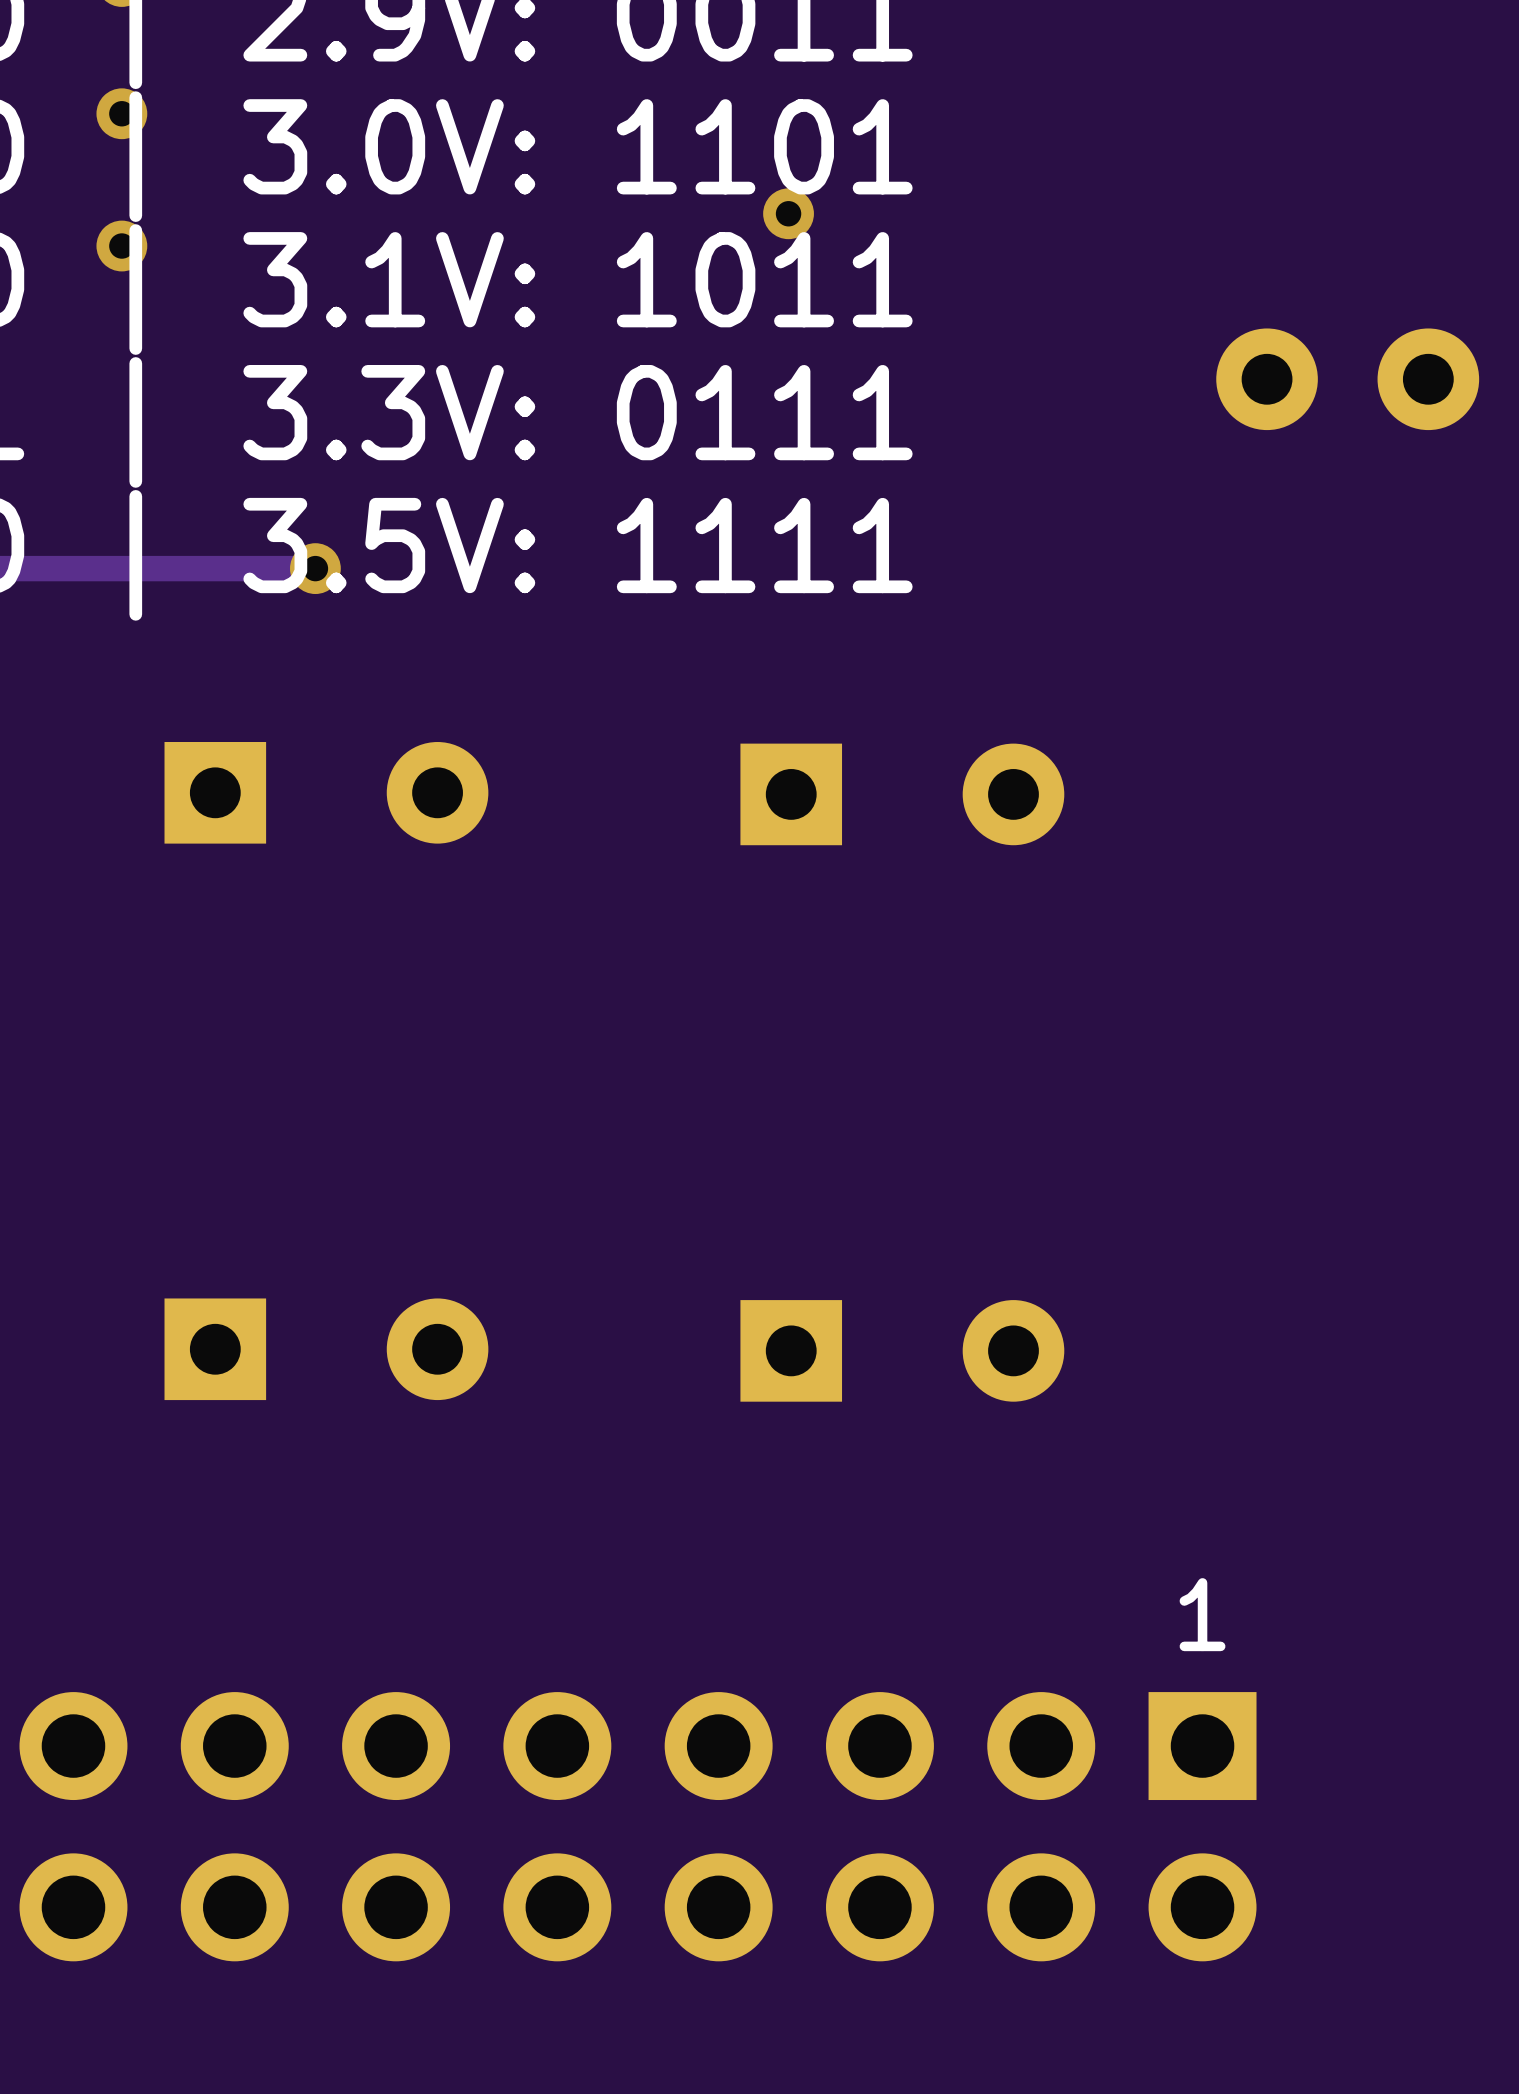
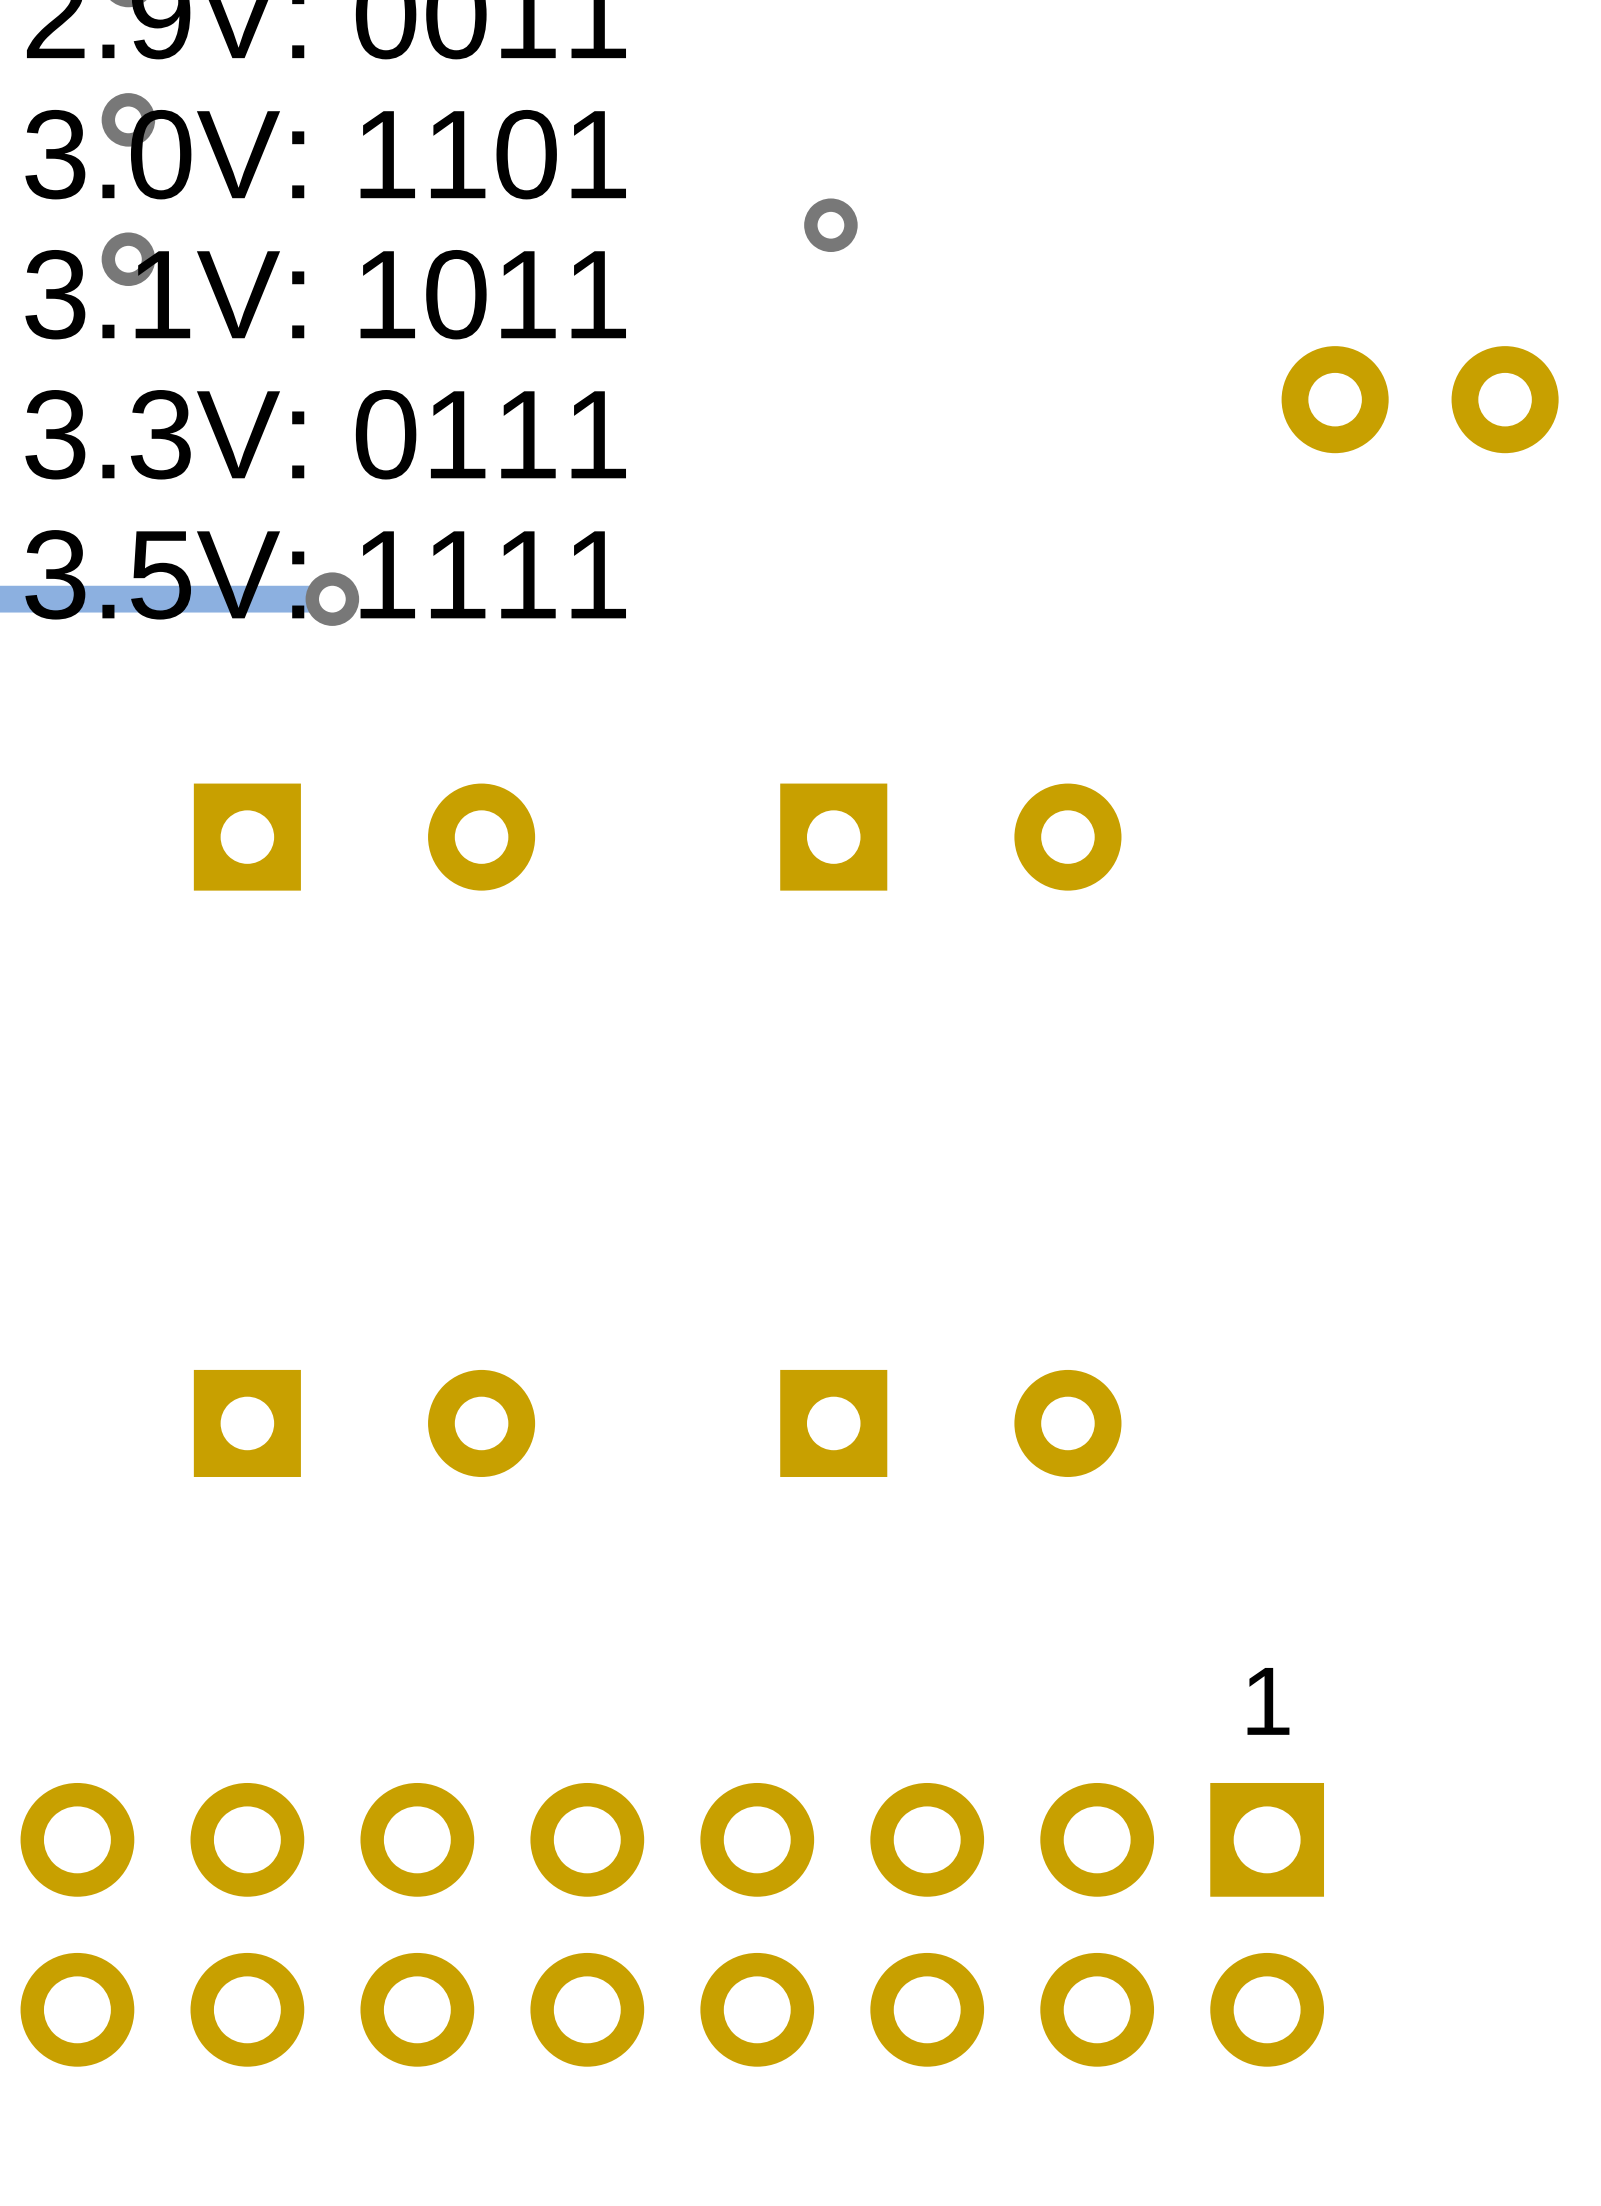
part position: (326, 792) -> (364, 837)
part position: (326, 1349) -> (364, 1423)

